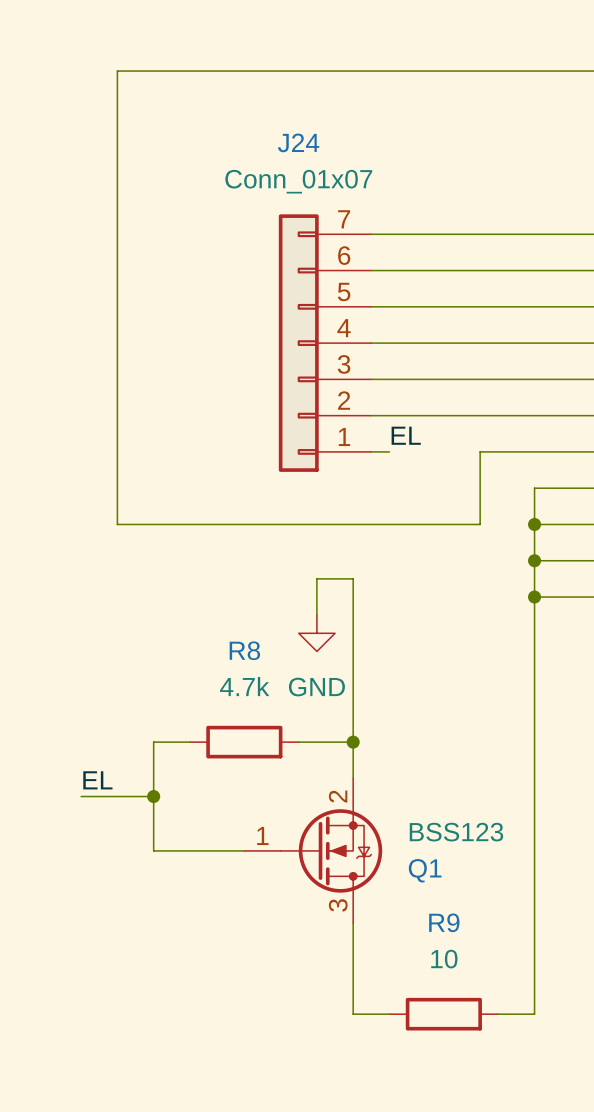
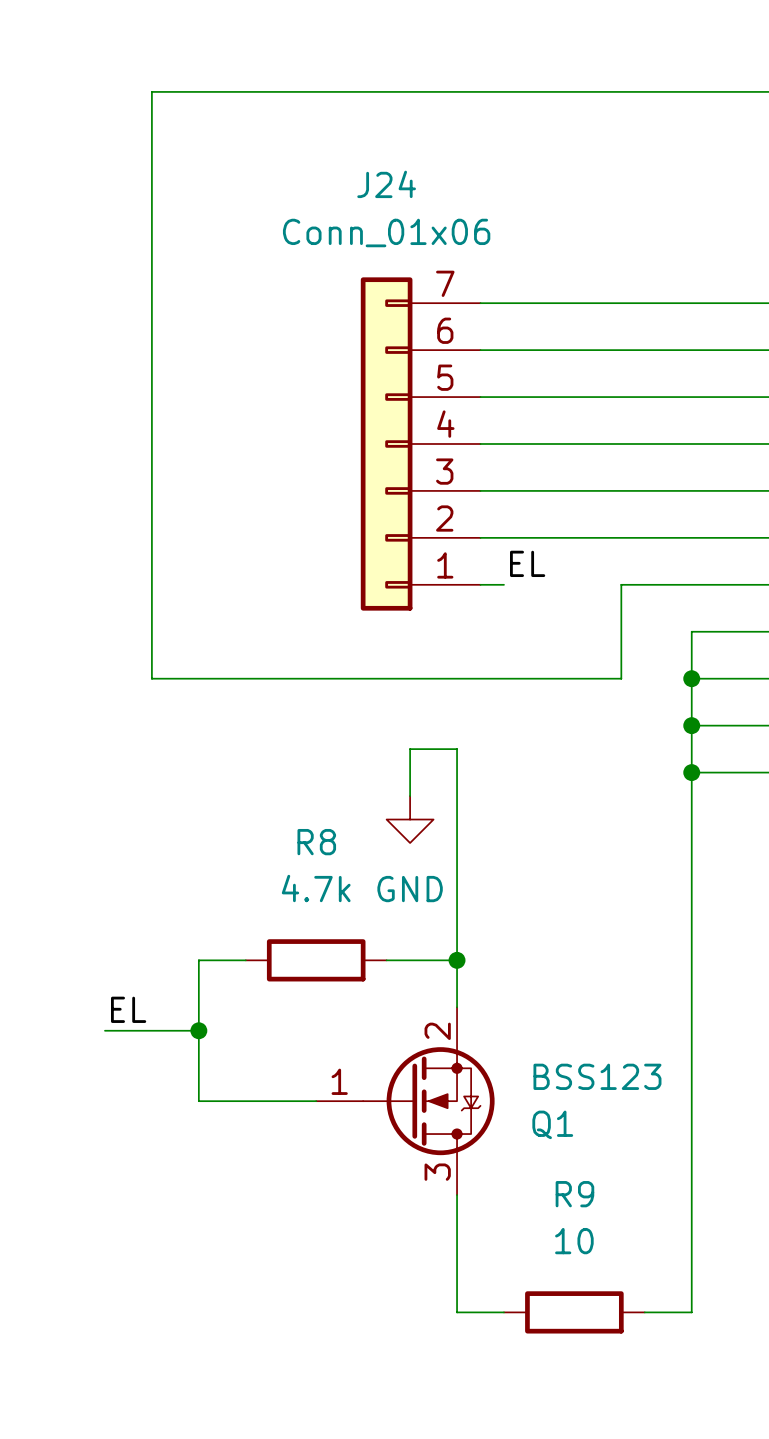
J24 value: Conn_01x07 (298, 181) -> Conn_01x06 (386, 233)

